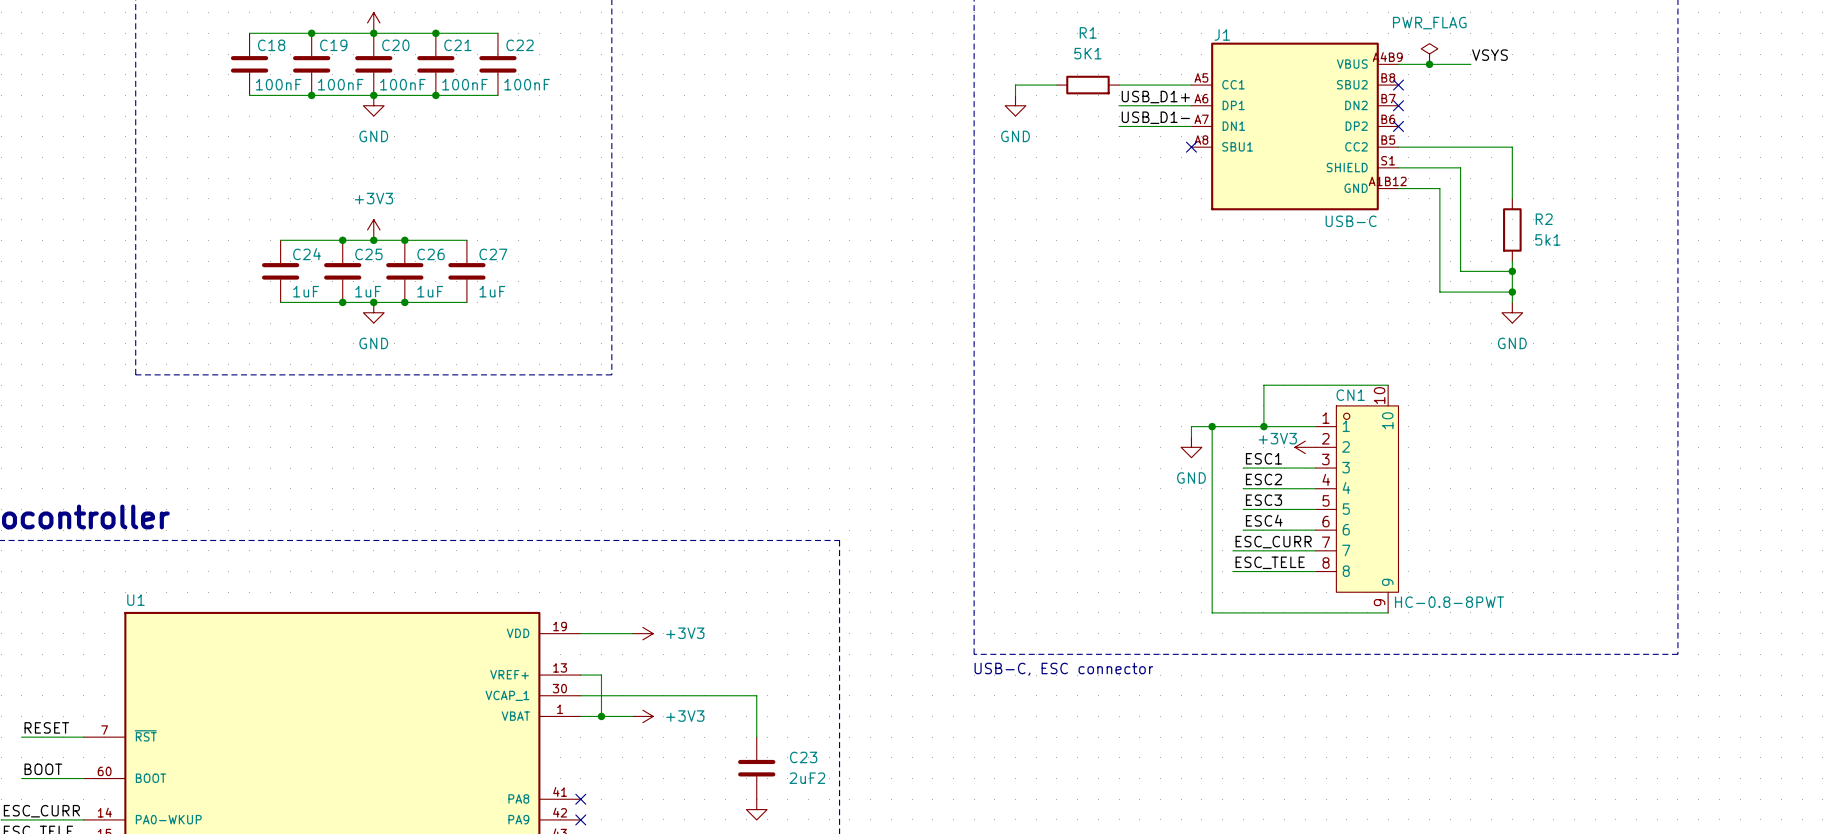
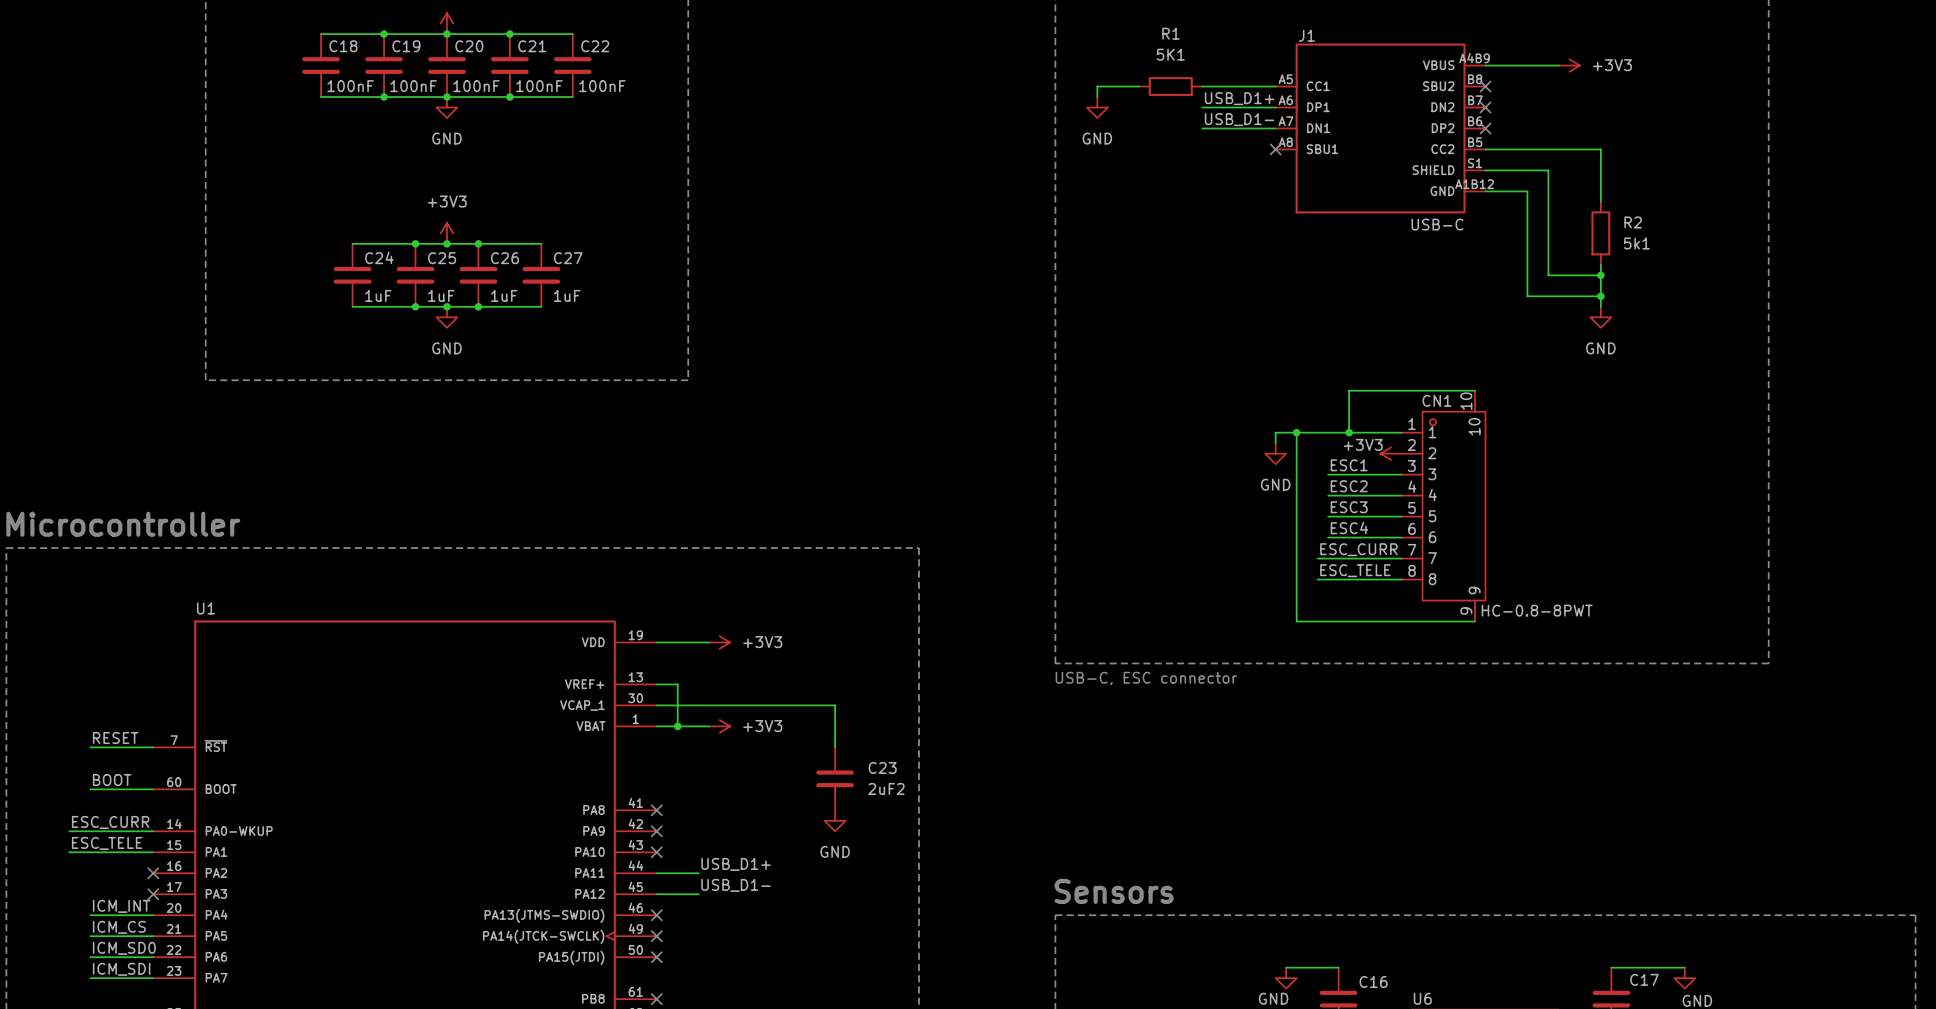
power symbol: PWR_FLAG (1429, 54) -> none
label: VSYS (1489, 55) -> none
junction: (1429, 64) -> none
power symbol: none -> +3V3 (1569, 65)

